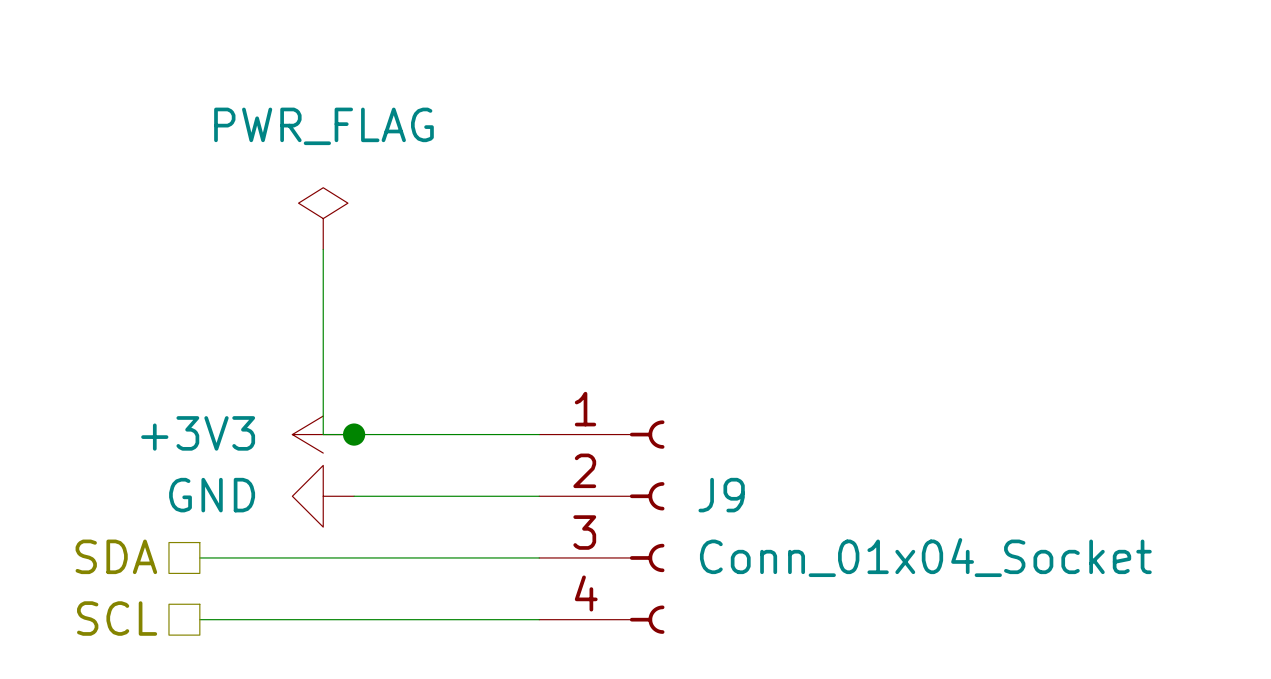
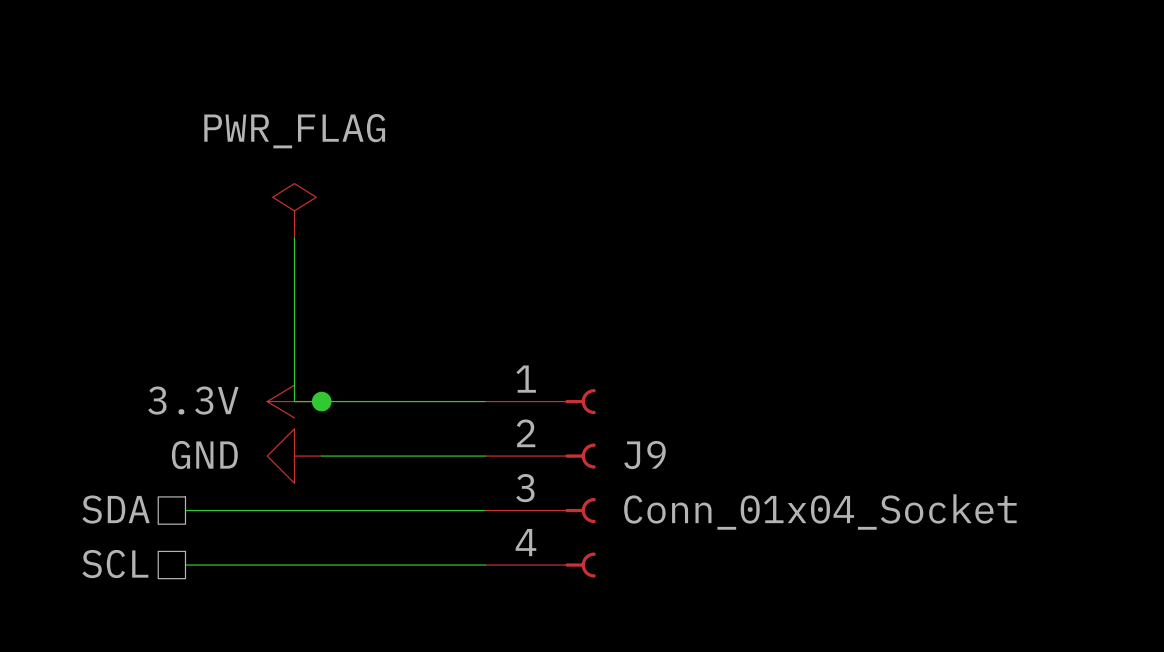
power symbol: +3V3 (323, 434) -> 3.3V (294, 401)

